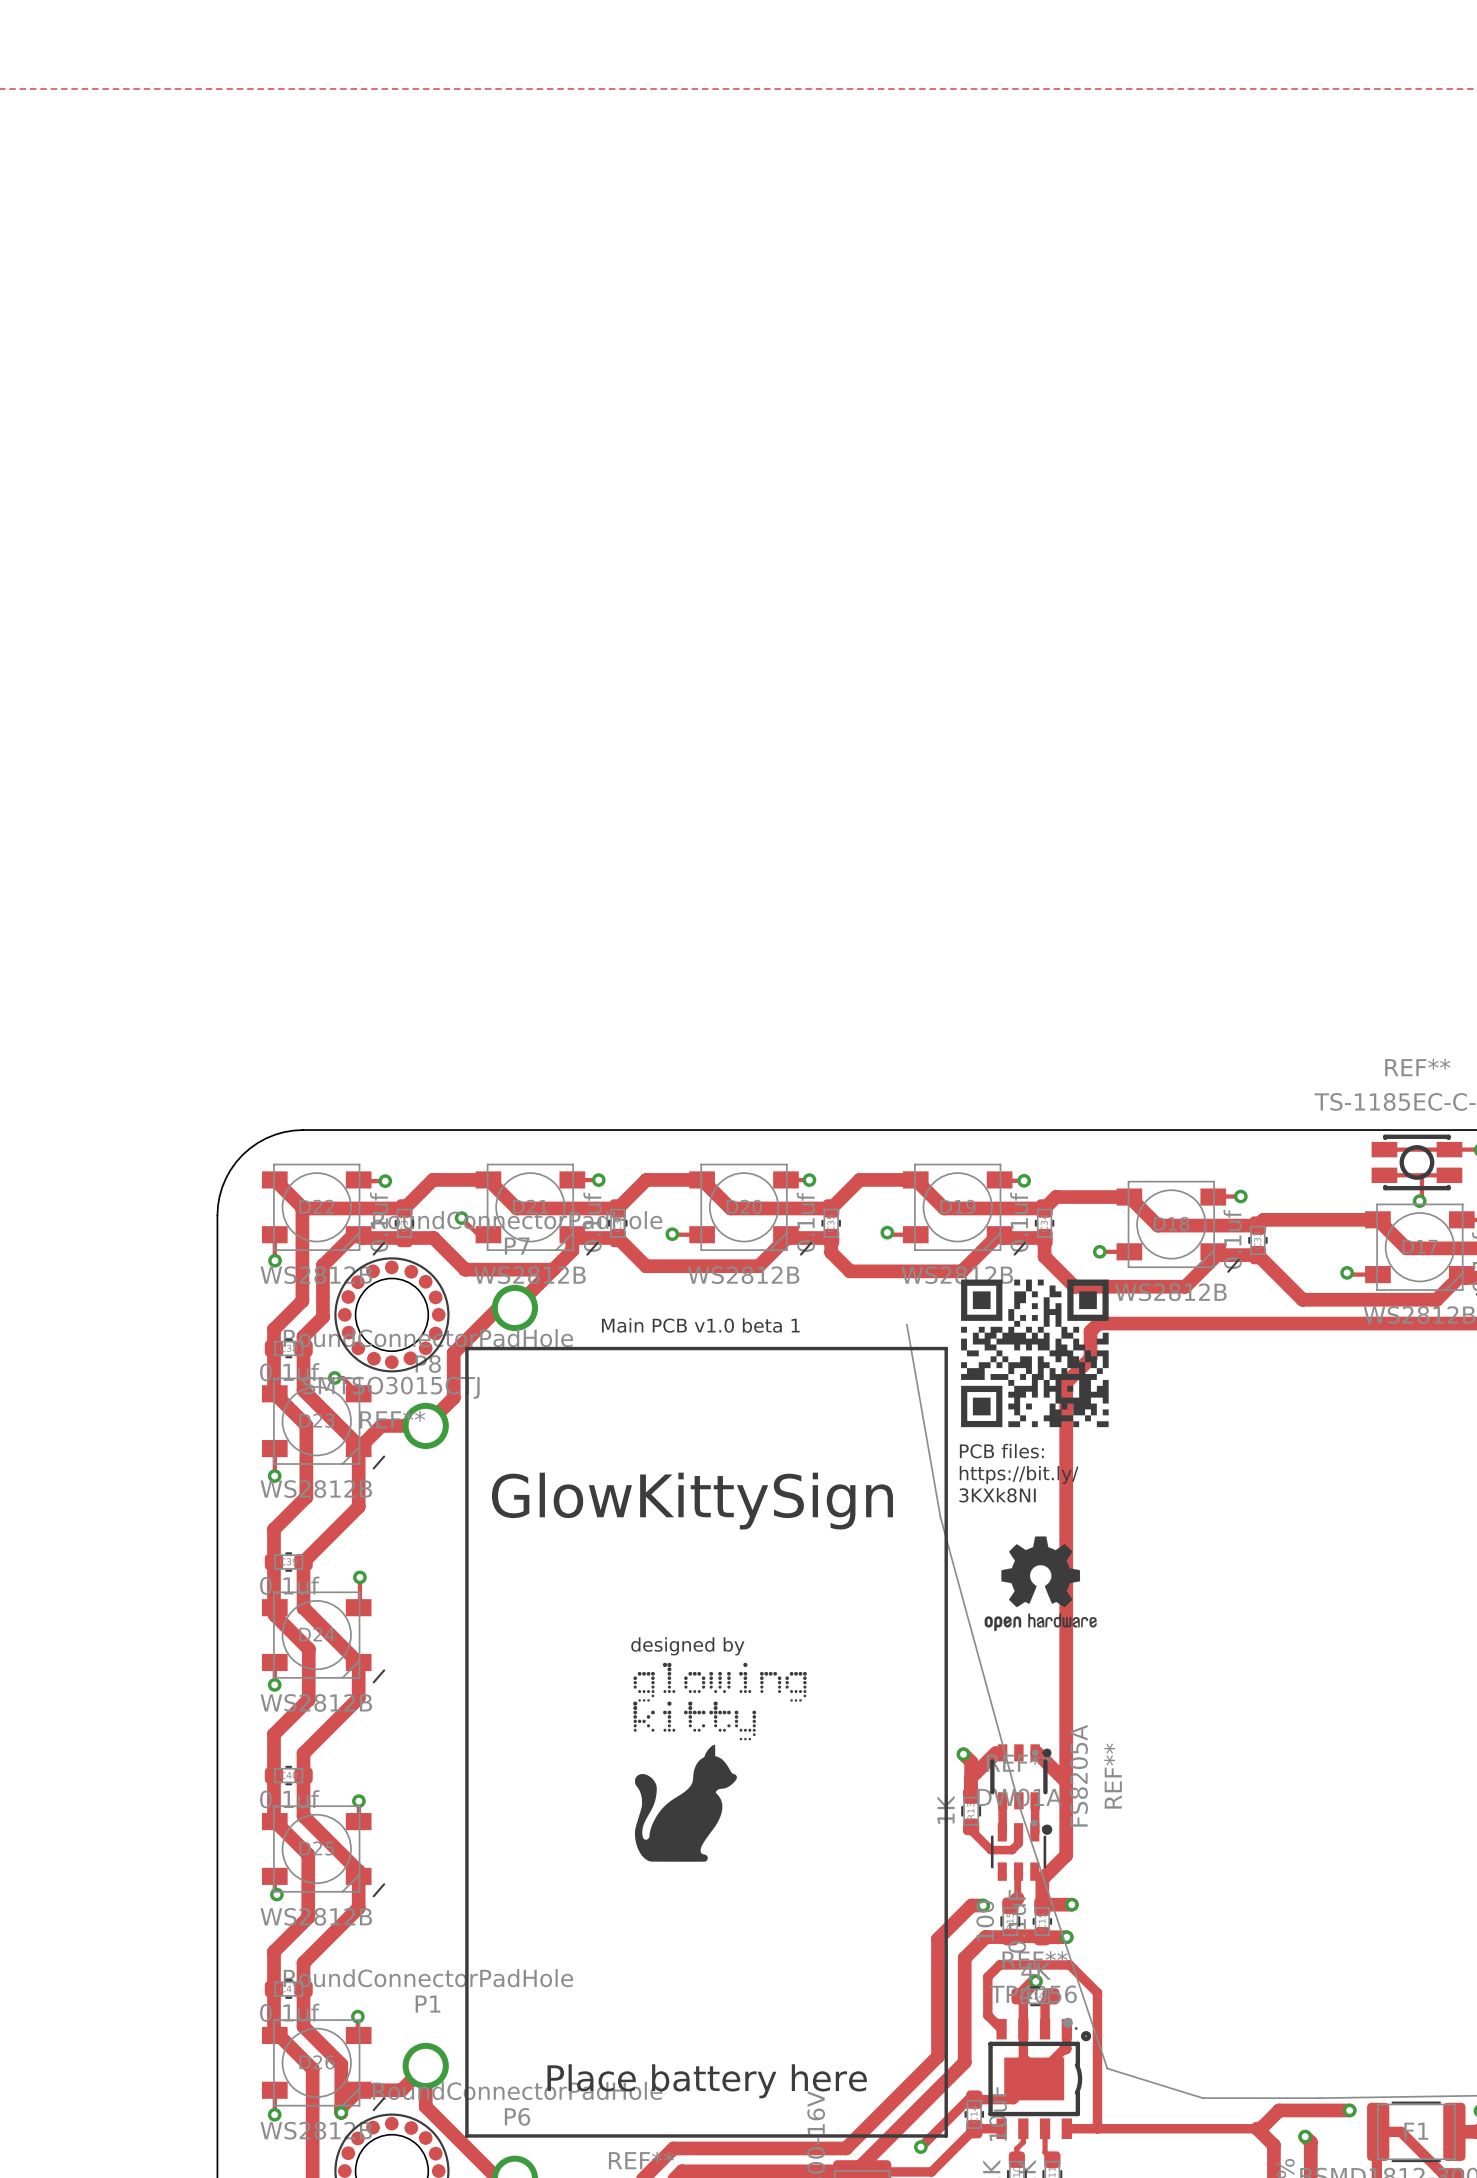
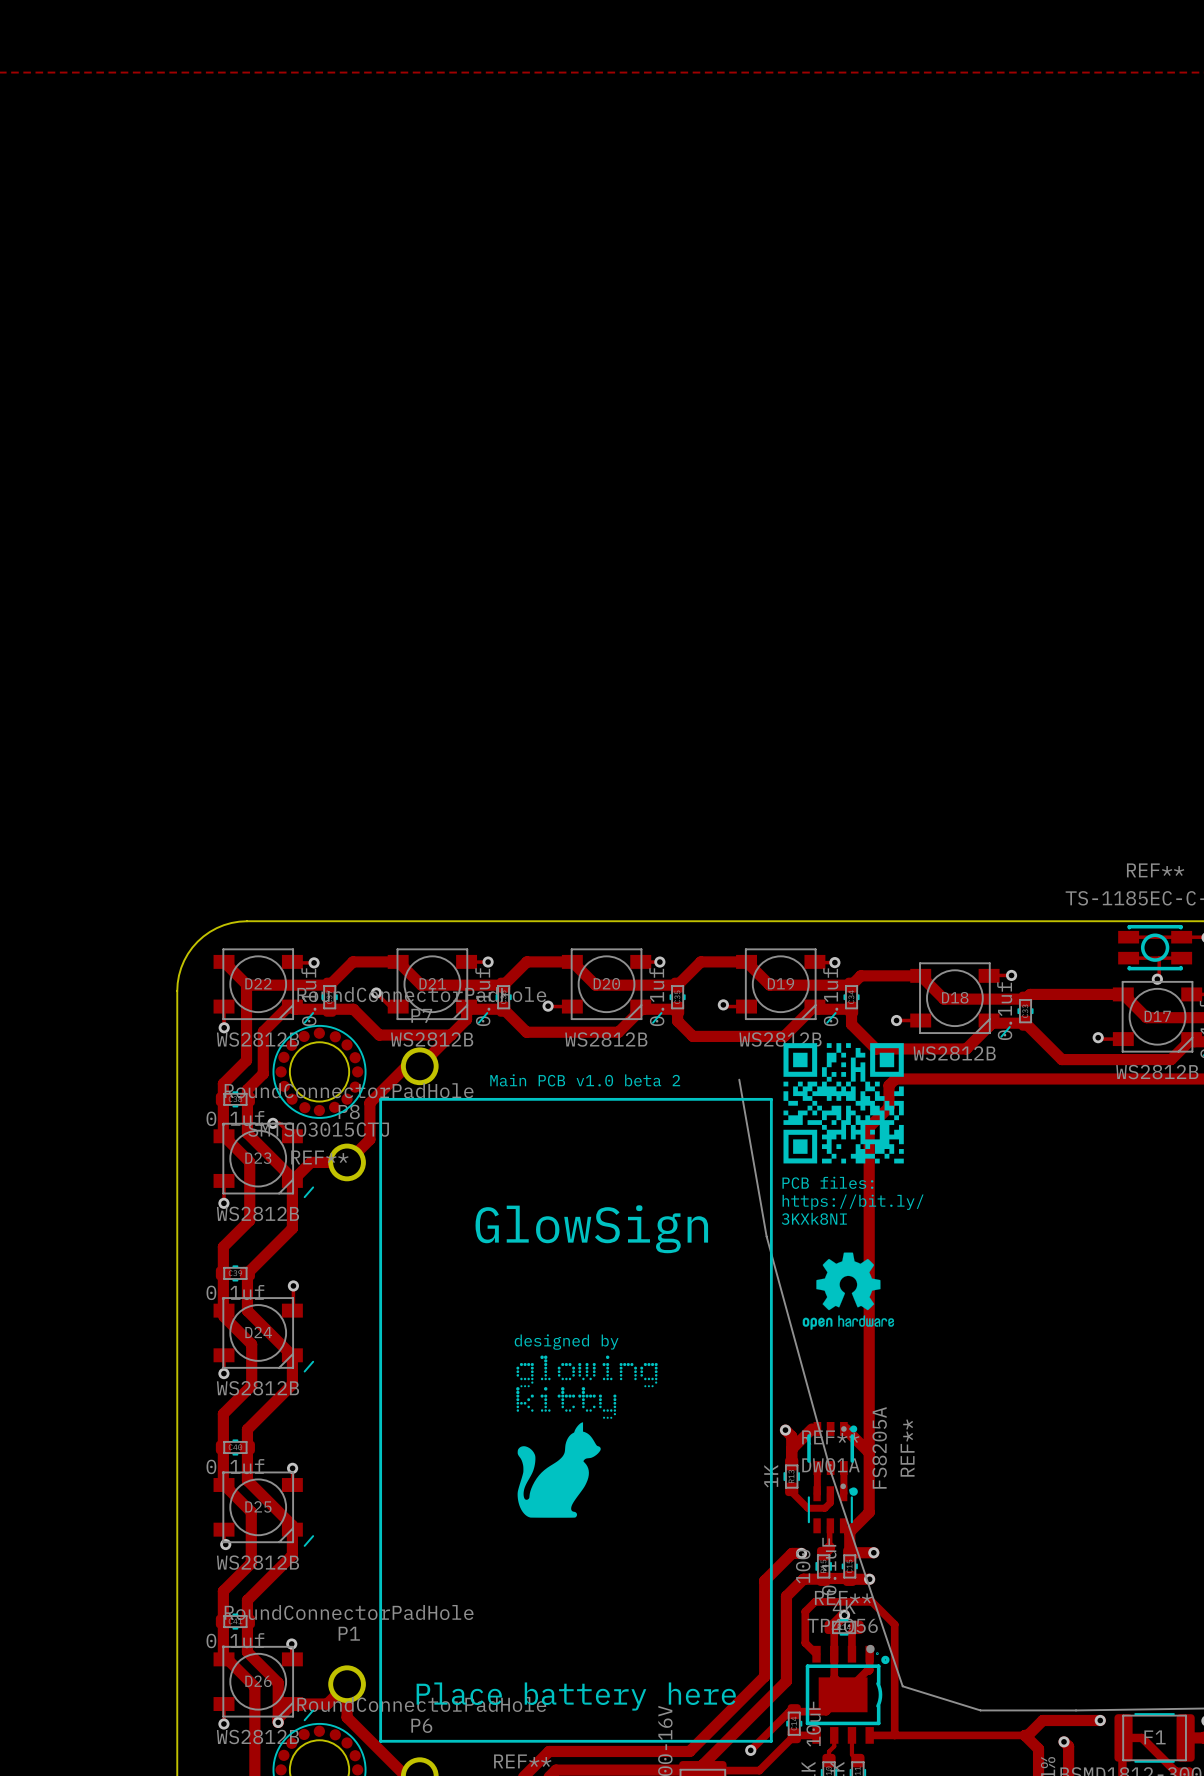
text: Main PCB v1.0 beta 1 (700, 1325) -> Main PCB v1.0 beta 2 (585, 1080)
text: GlowKittySign (692, 1501) -> GlowSign (591, 1229)

